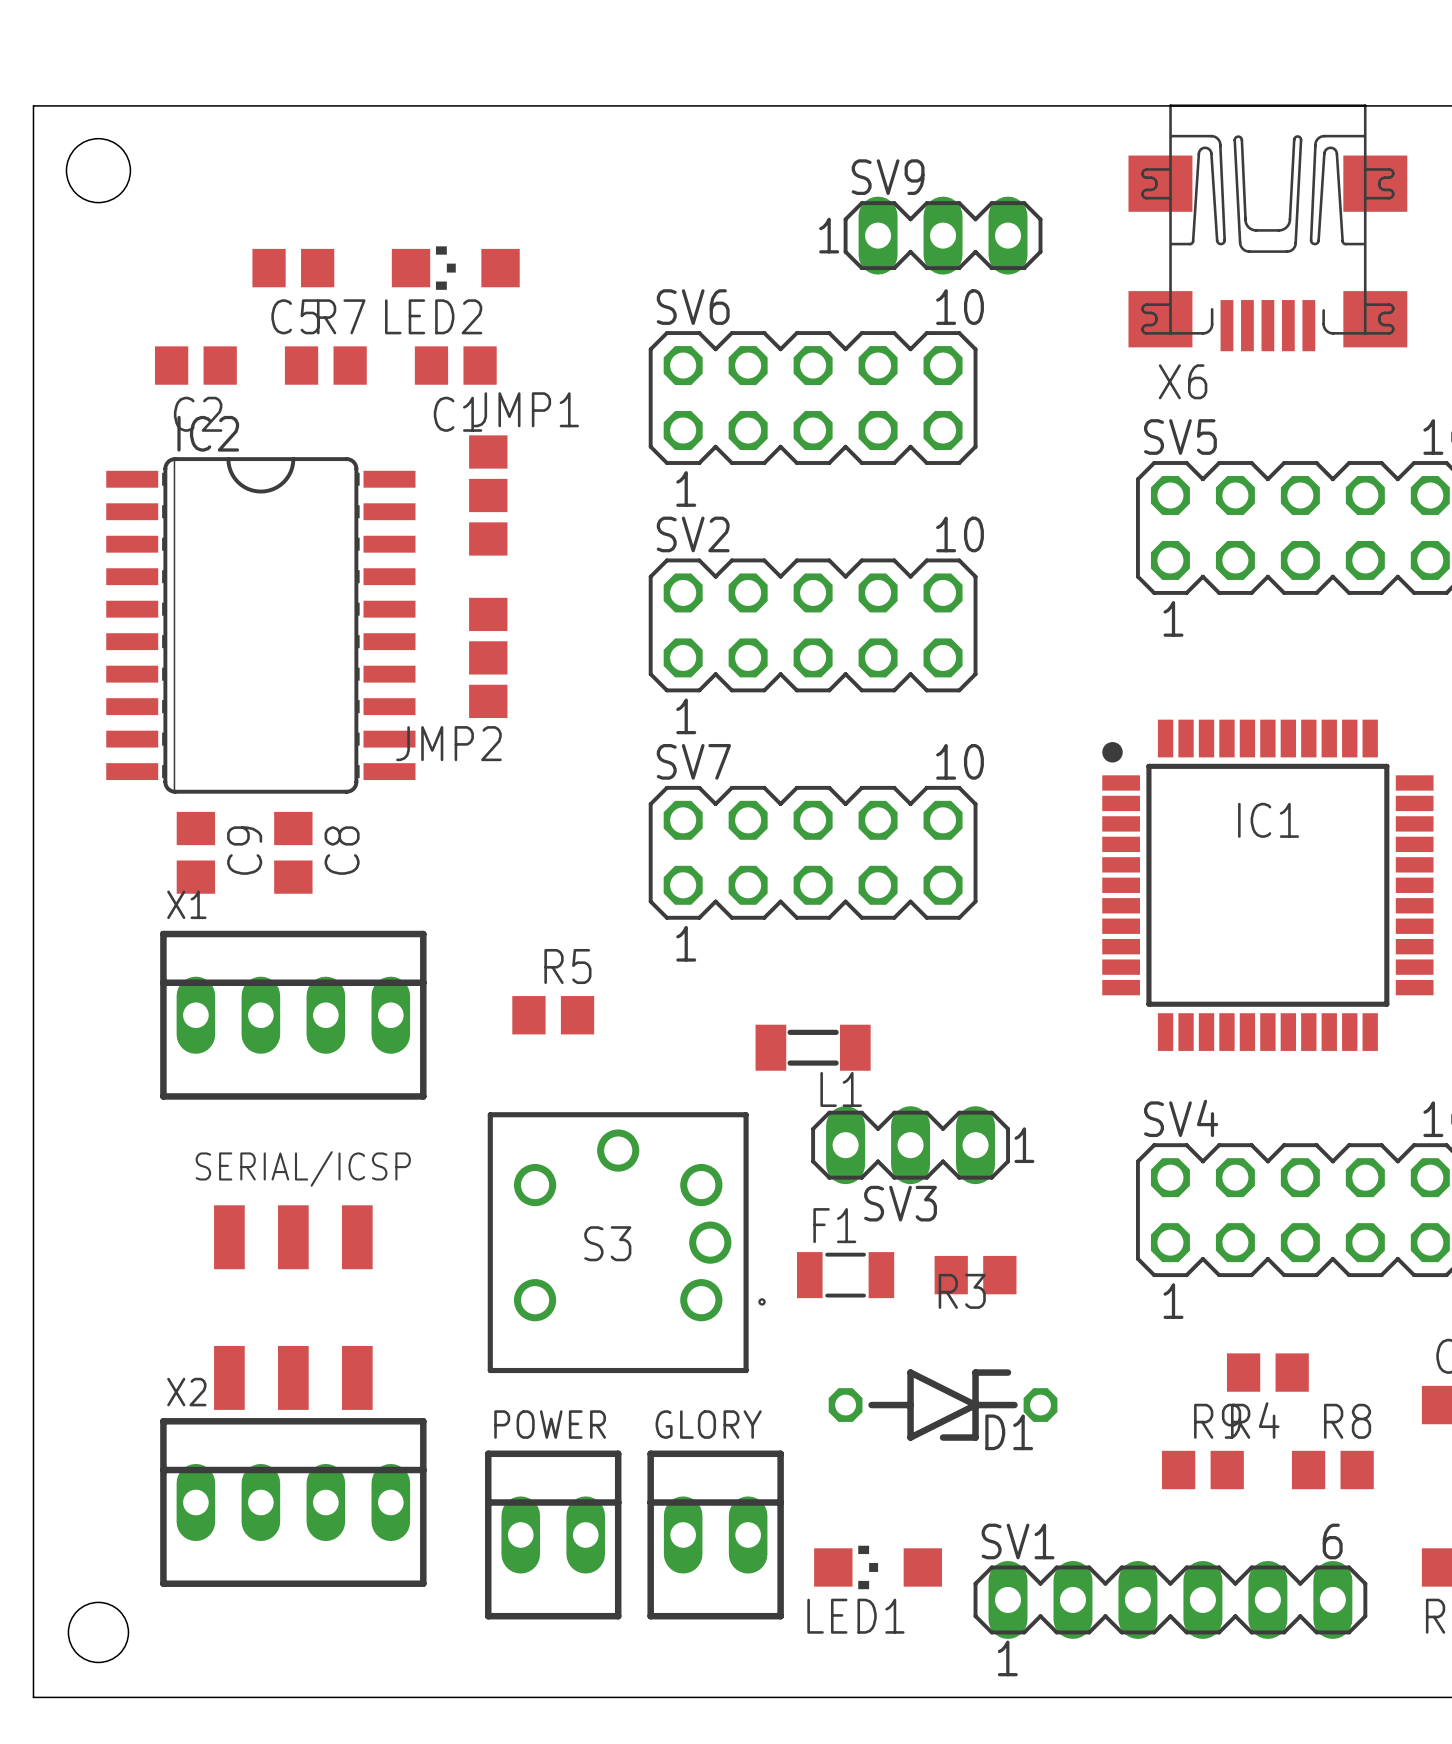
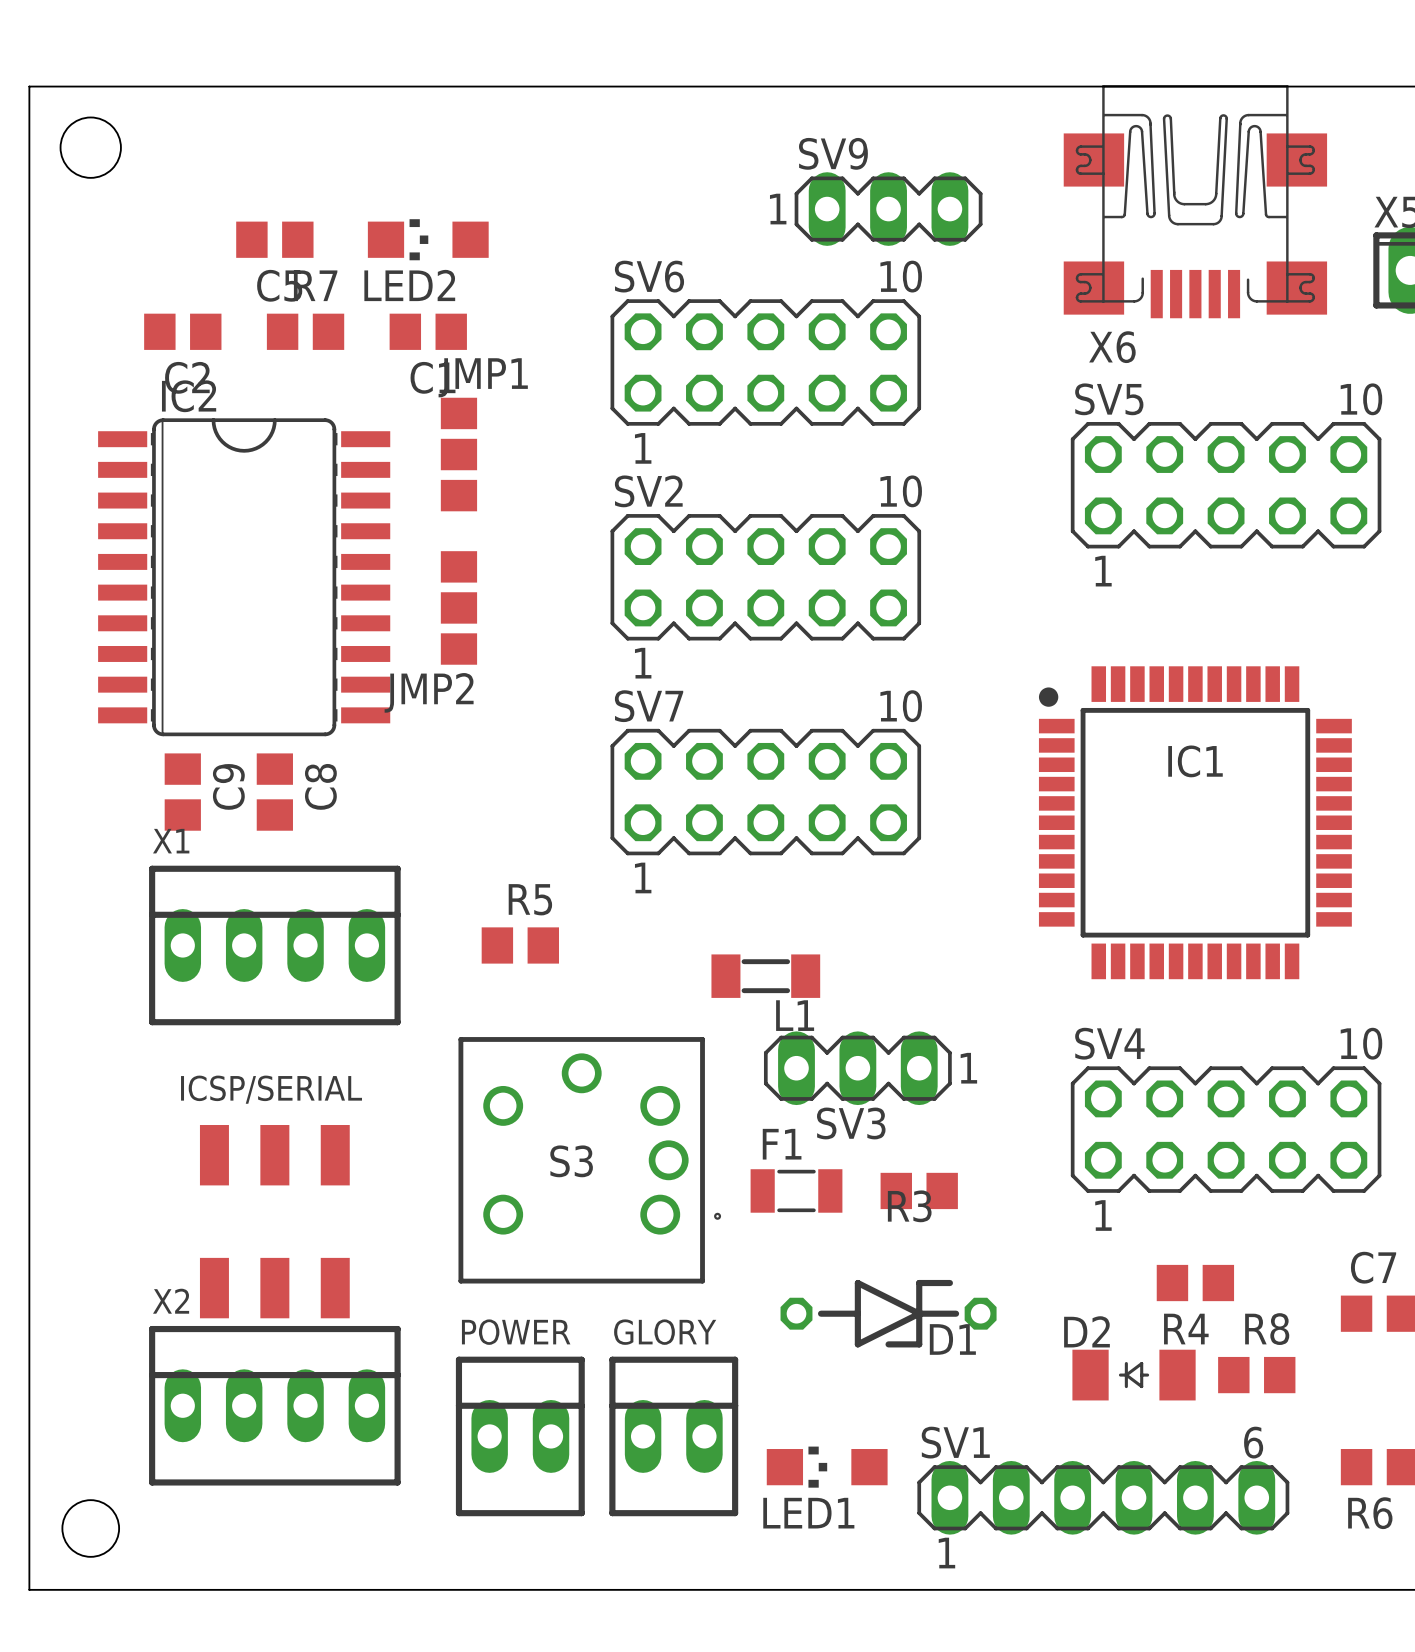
SERIAL/ICSP name: SERIAL/ICSP (303, 1168) -> ICSP/SERIAL (271, 1089)
R9: (1202, 1470) -> none
D2: none -> (1134, 1375)

